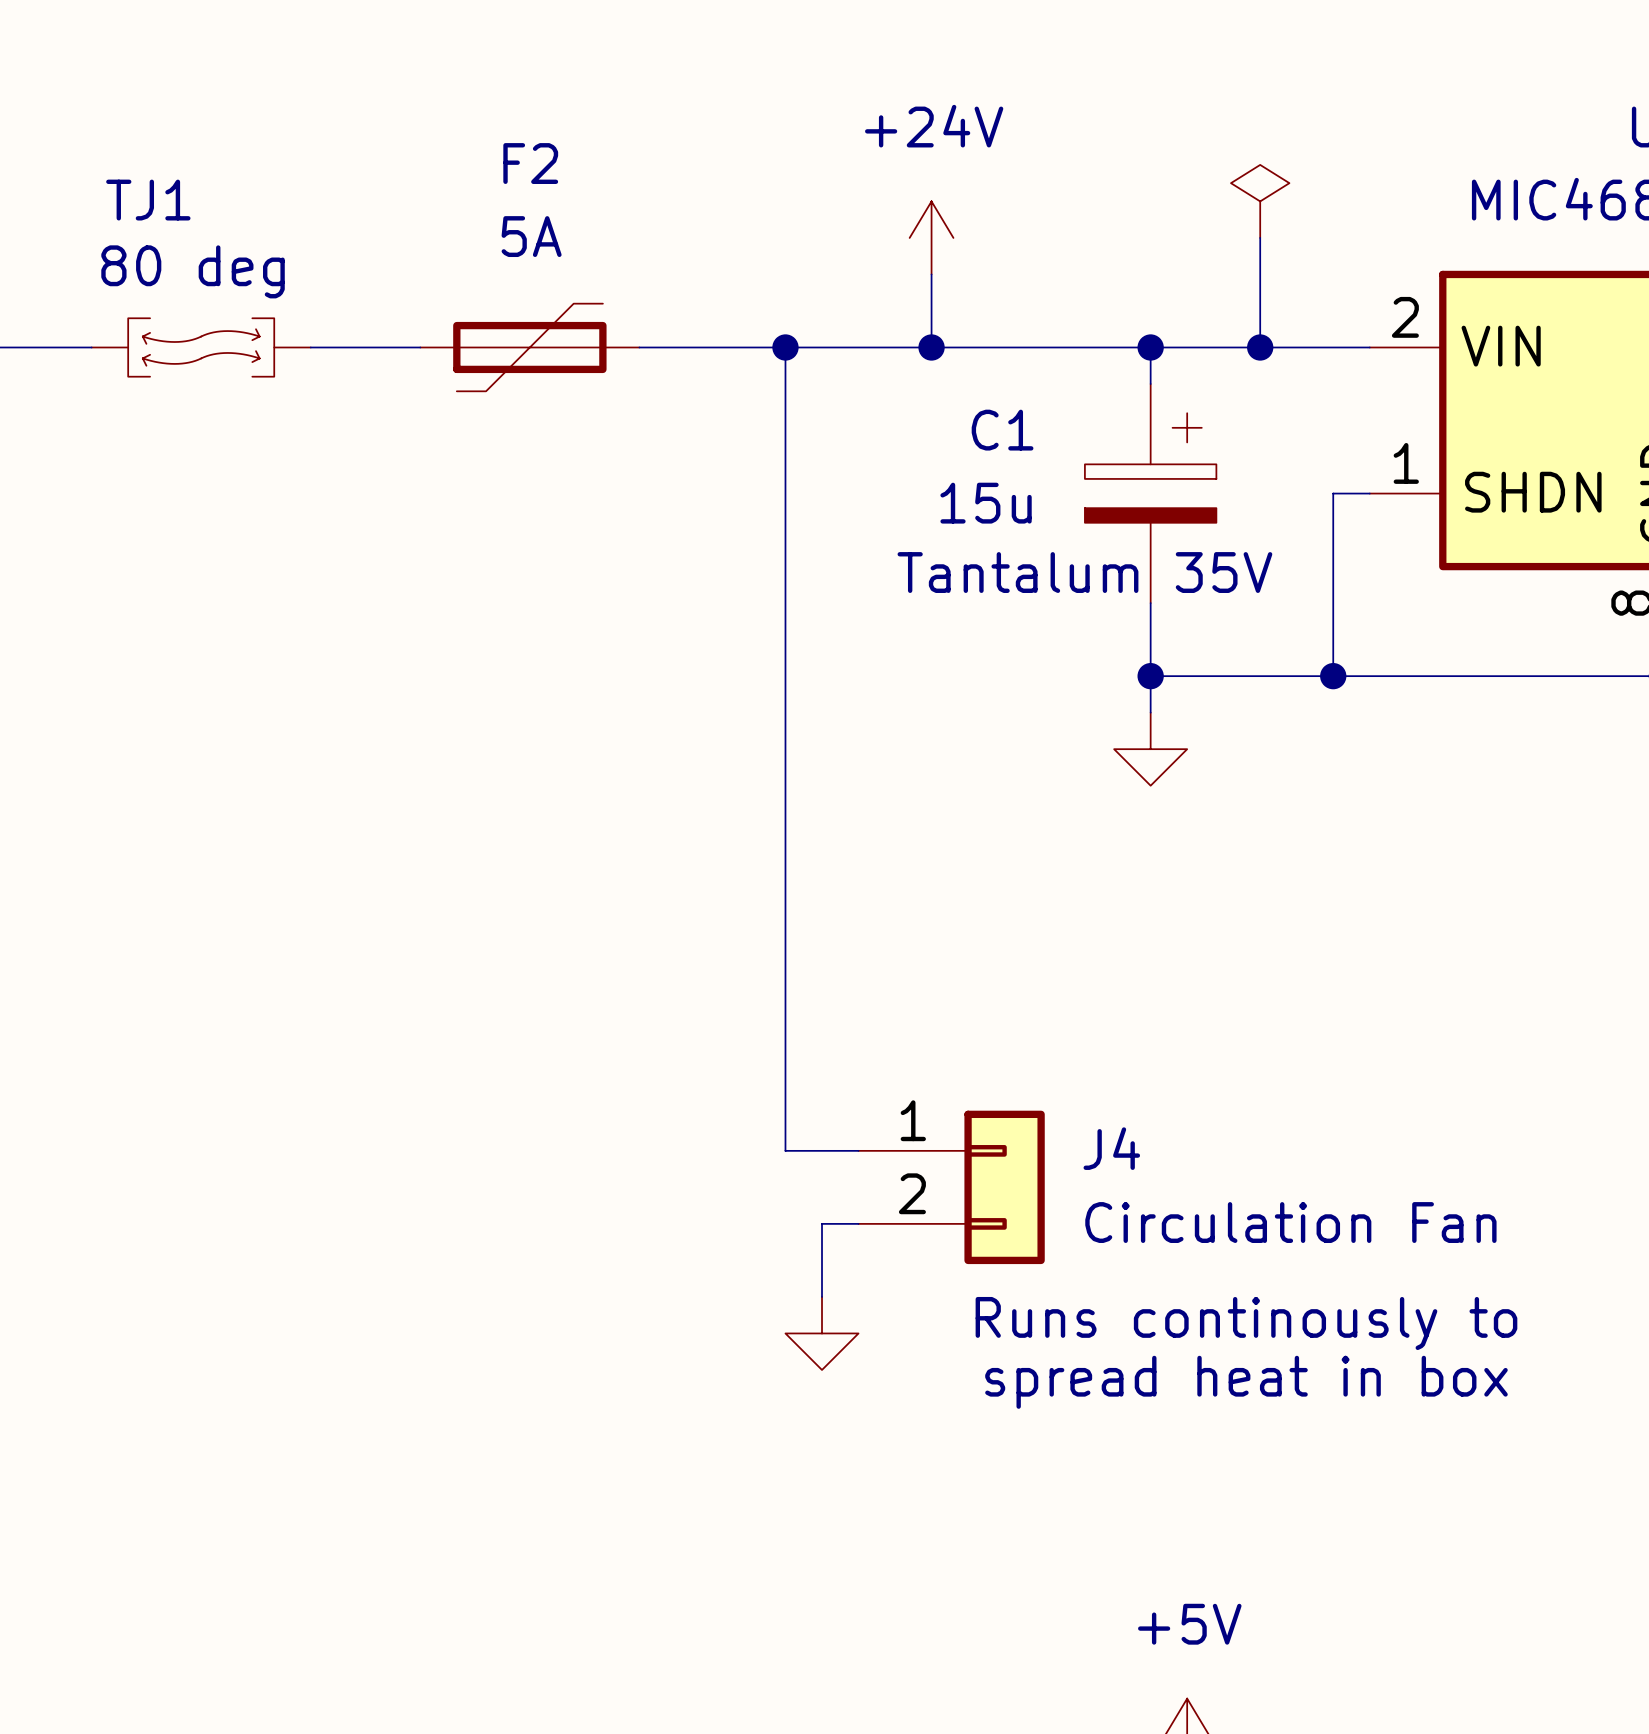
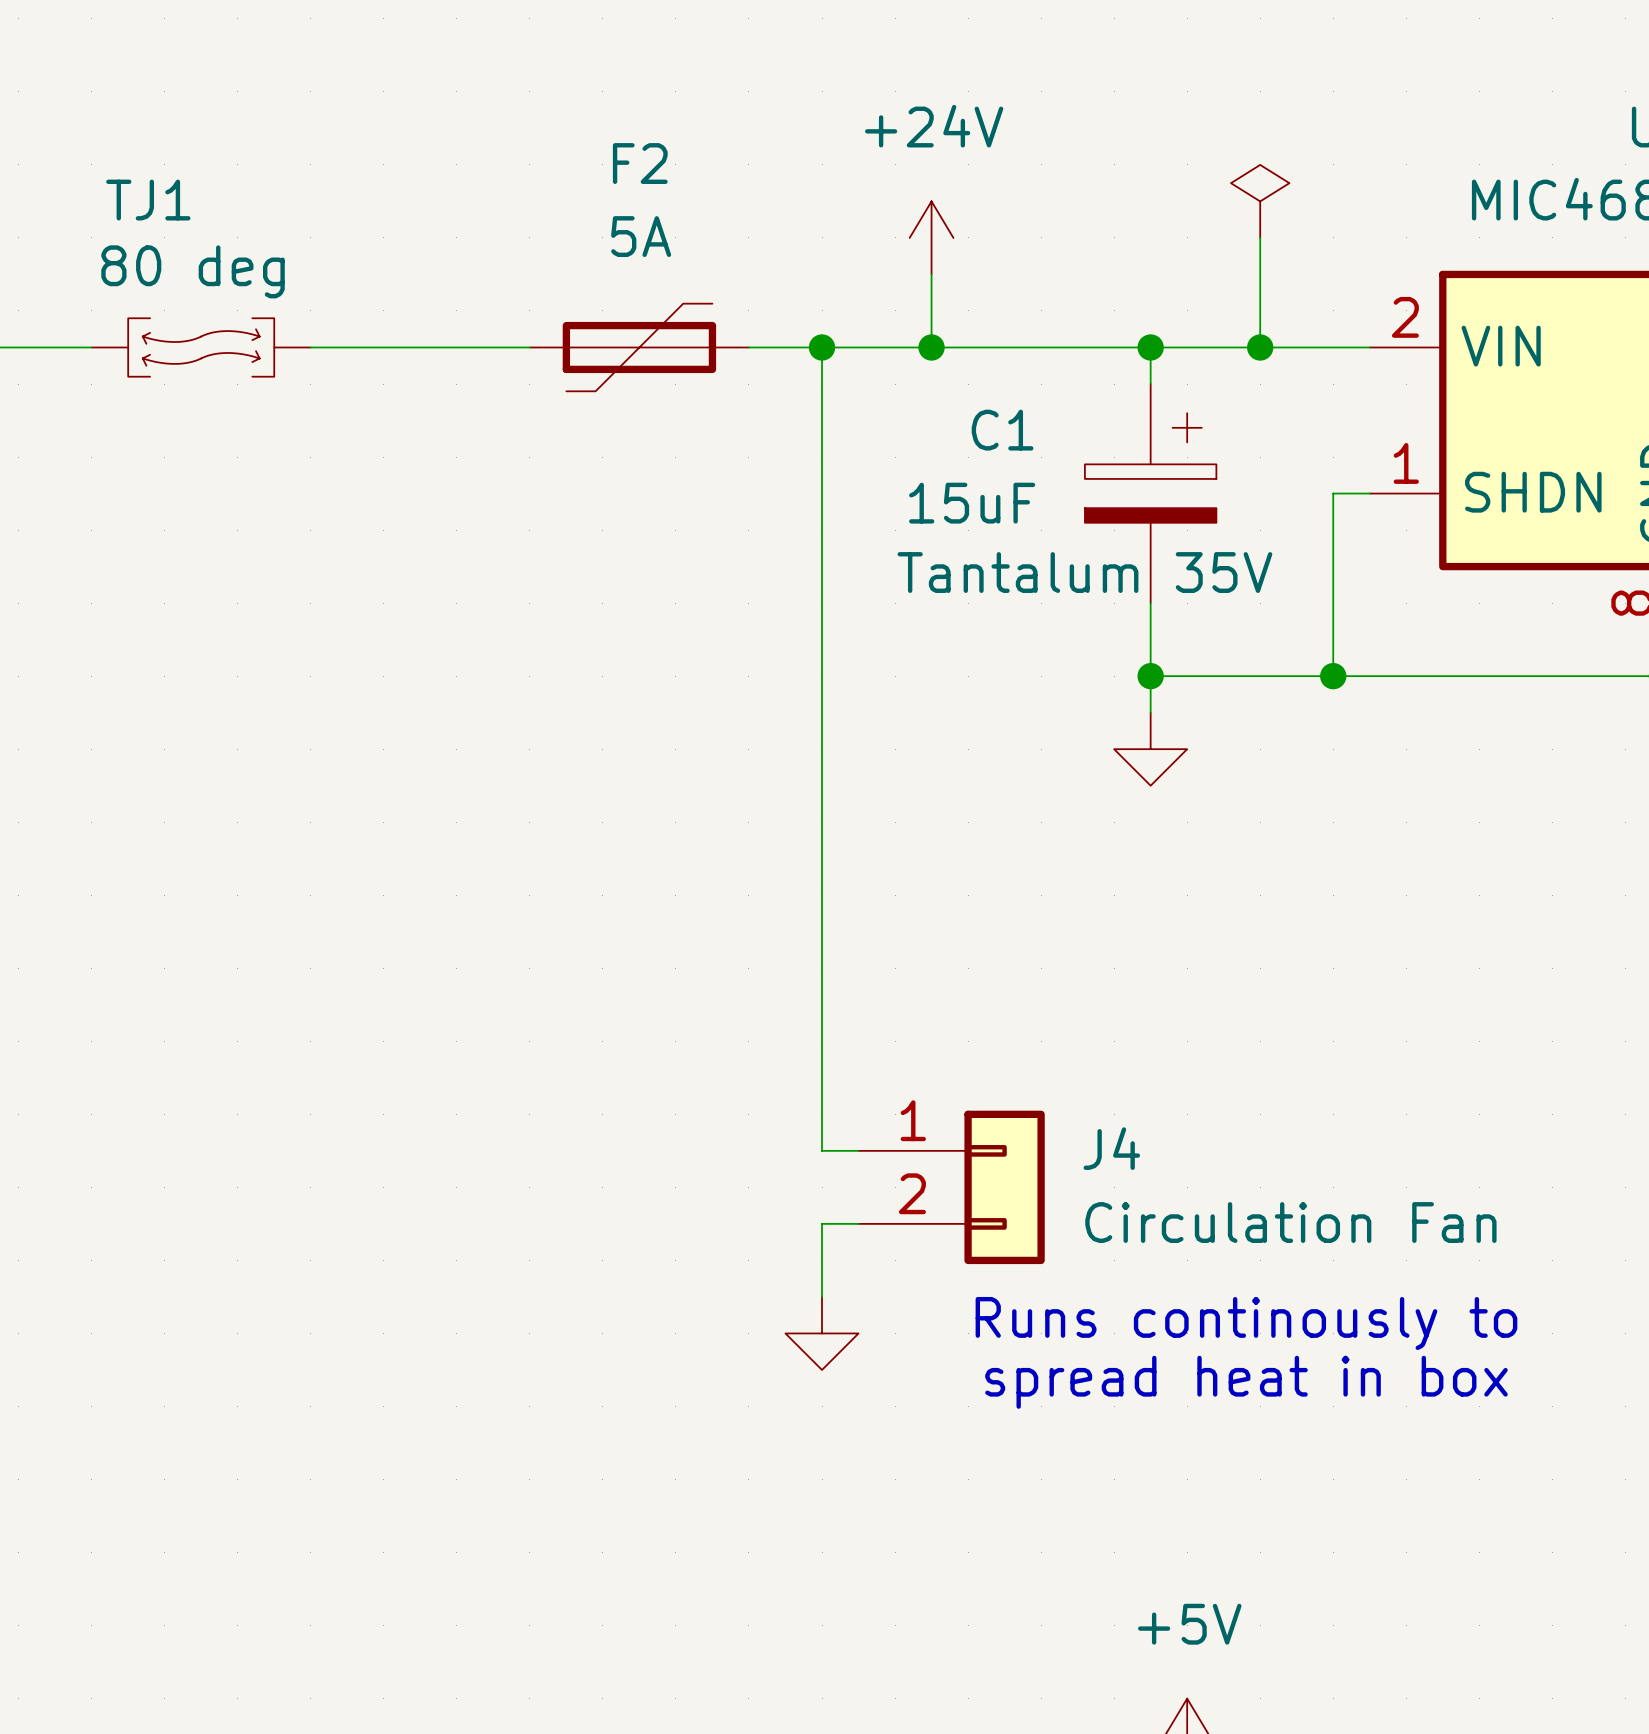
F2 position: (529, 347) -> (639, 347)
wire: (785, 347) (785, 1150) (822, 1150) -> (822, 347) (822, 1150)
junction position: (785, 347) -> (822, 347)
C1 value: 15u (986, 503) -> 15uF (972, 503)

